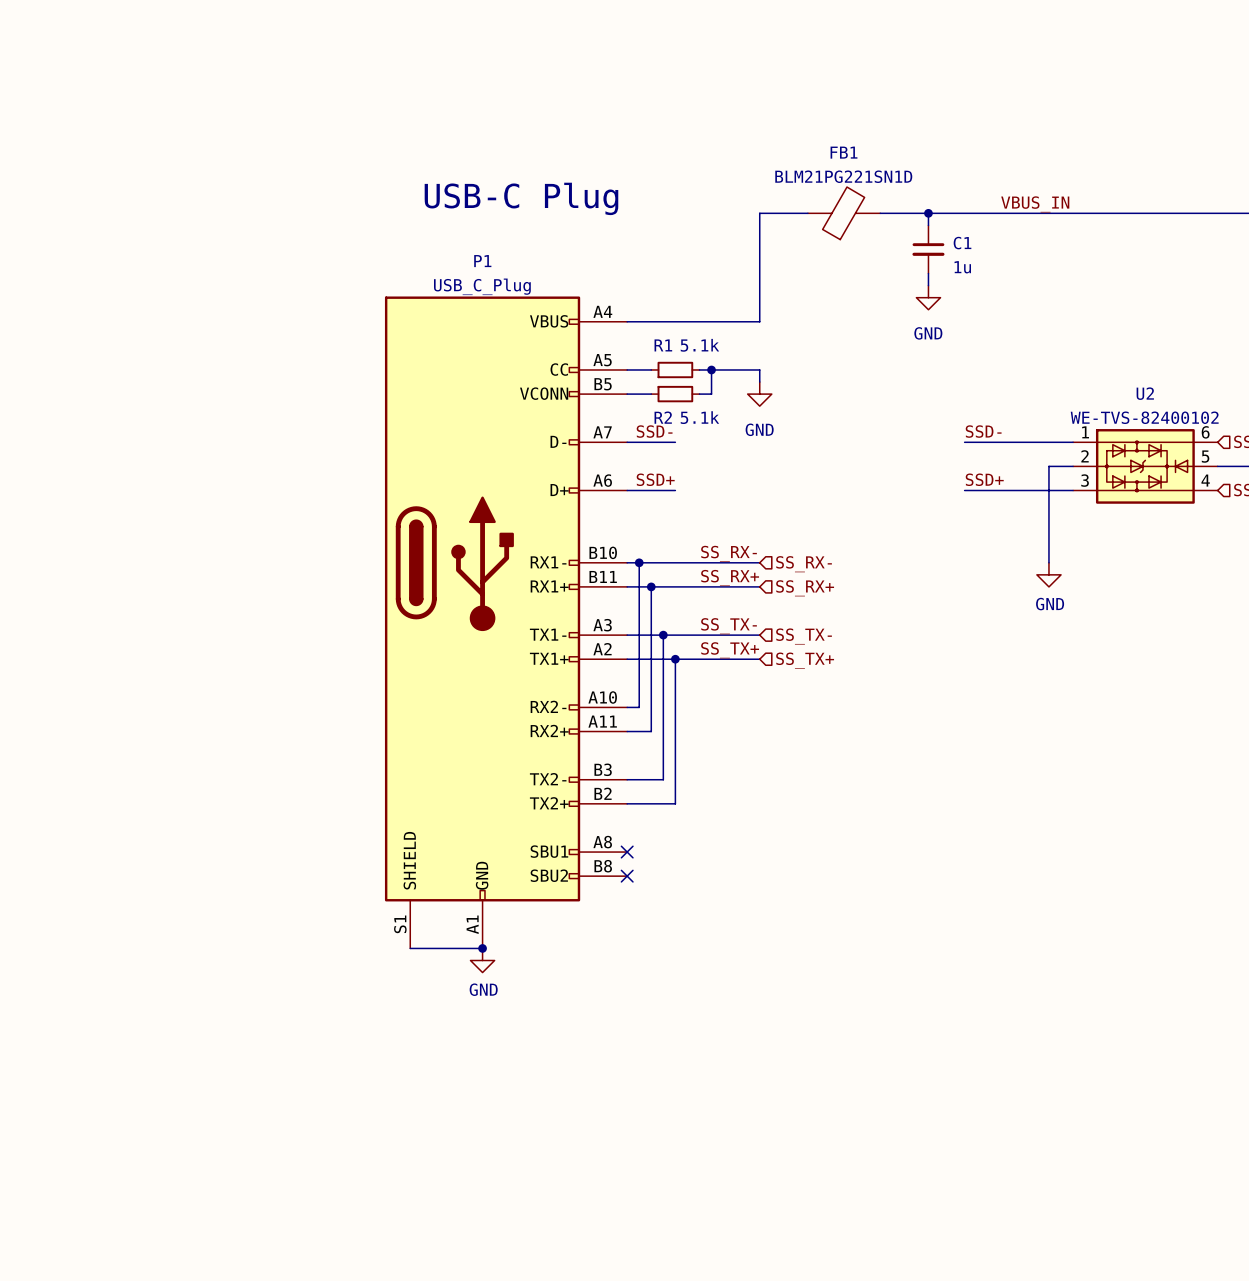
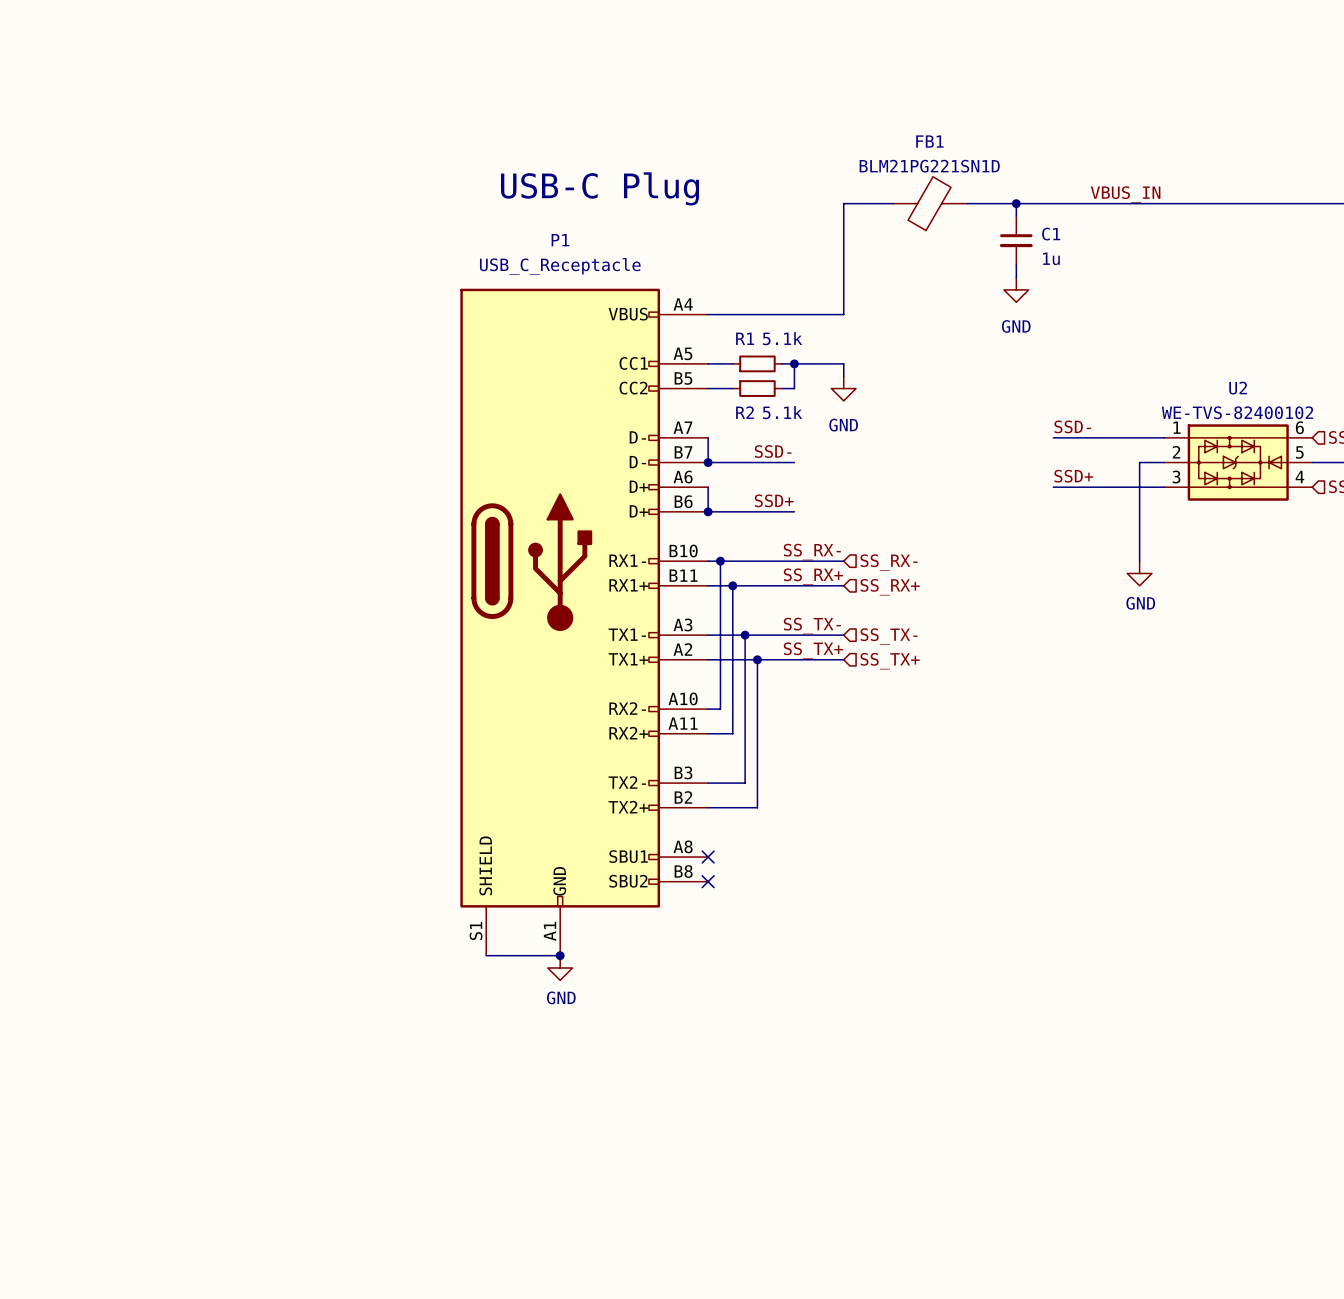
P1 value: USB_C_Plug (482, 286) -> USB_C_Receptacle (560, 266)
P1 symbol: [384, 296, 628, 949] -> [460, 288, 709, 956]
label position: SSD- (654, 431) -> SSD- (773, 451)
wire: (627, 442) (675, 442) -> (708, 437) (708, 462) (794, 462)
junction: none -> (708, 462)
label position: SSD+ (655, 479) -> SSD+ (774, 500)
wire: (627, 490) (675, 490) -> (708, 487) (708, 511) (794, 511)
junction: none -> (708, 511)

